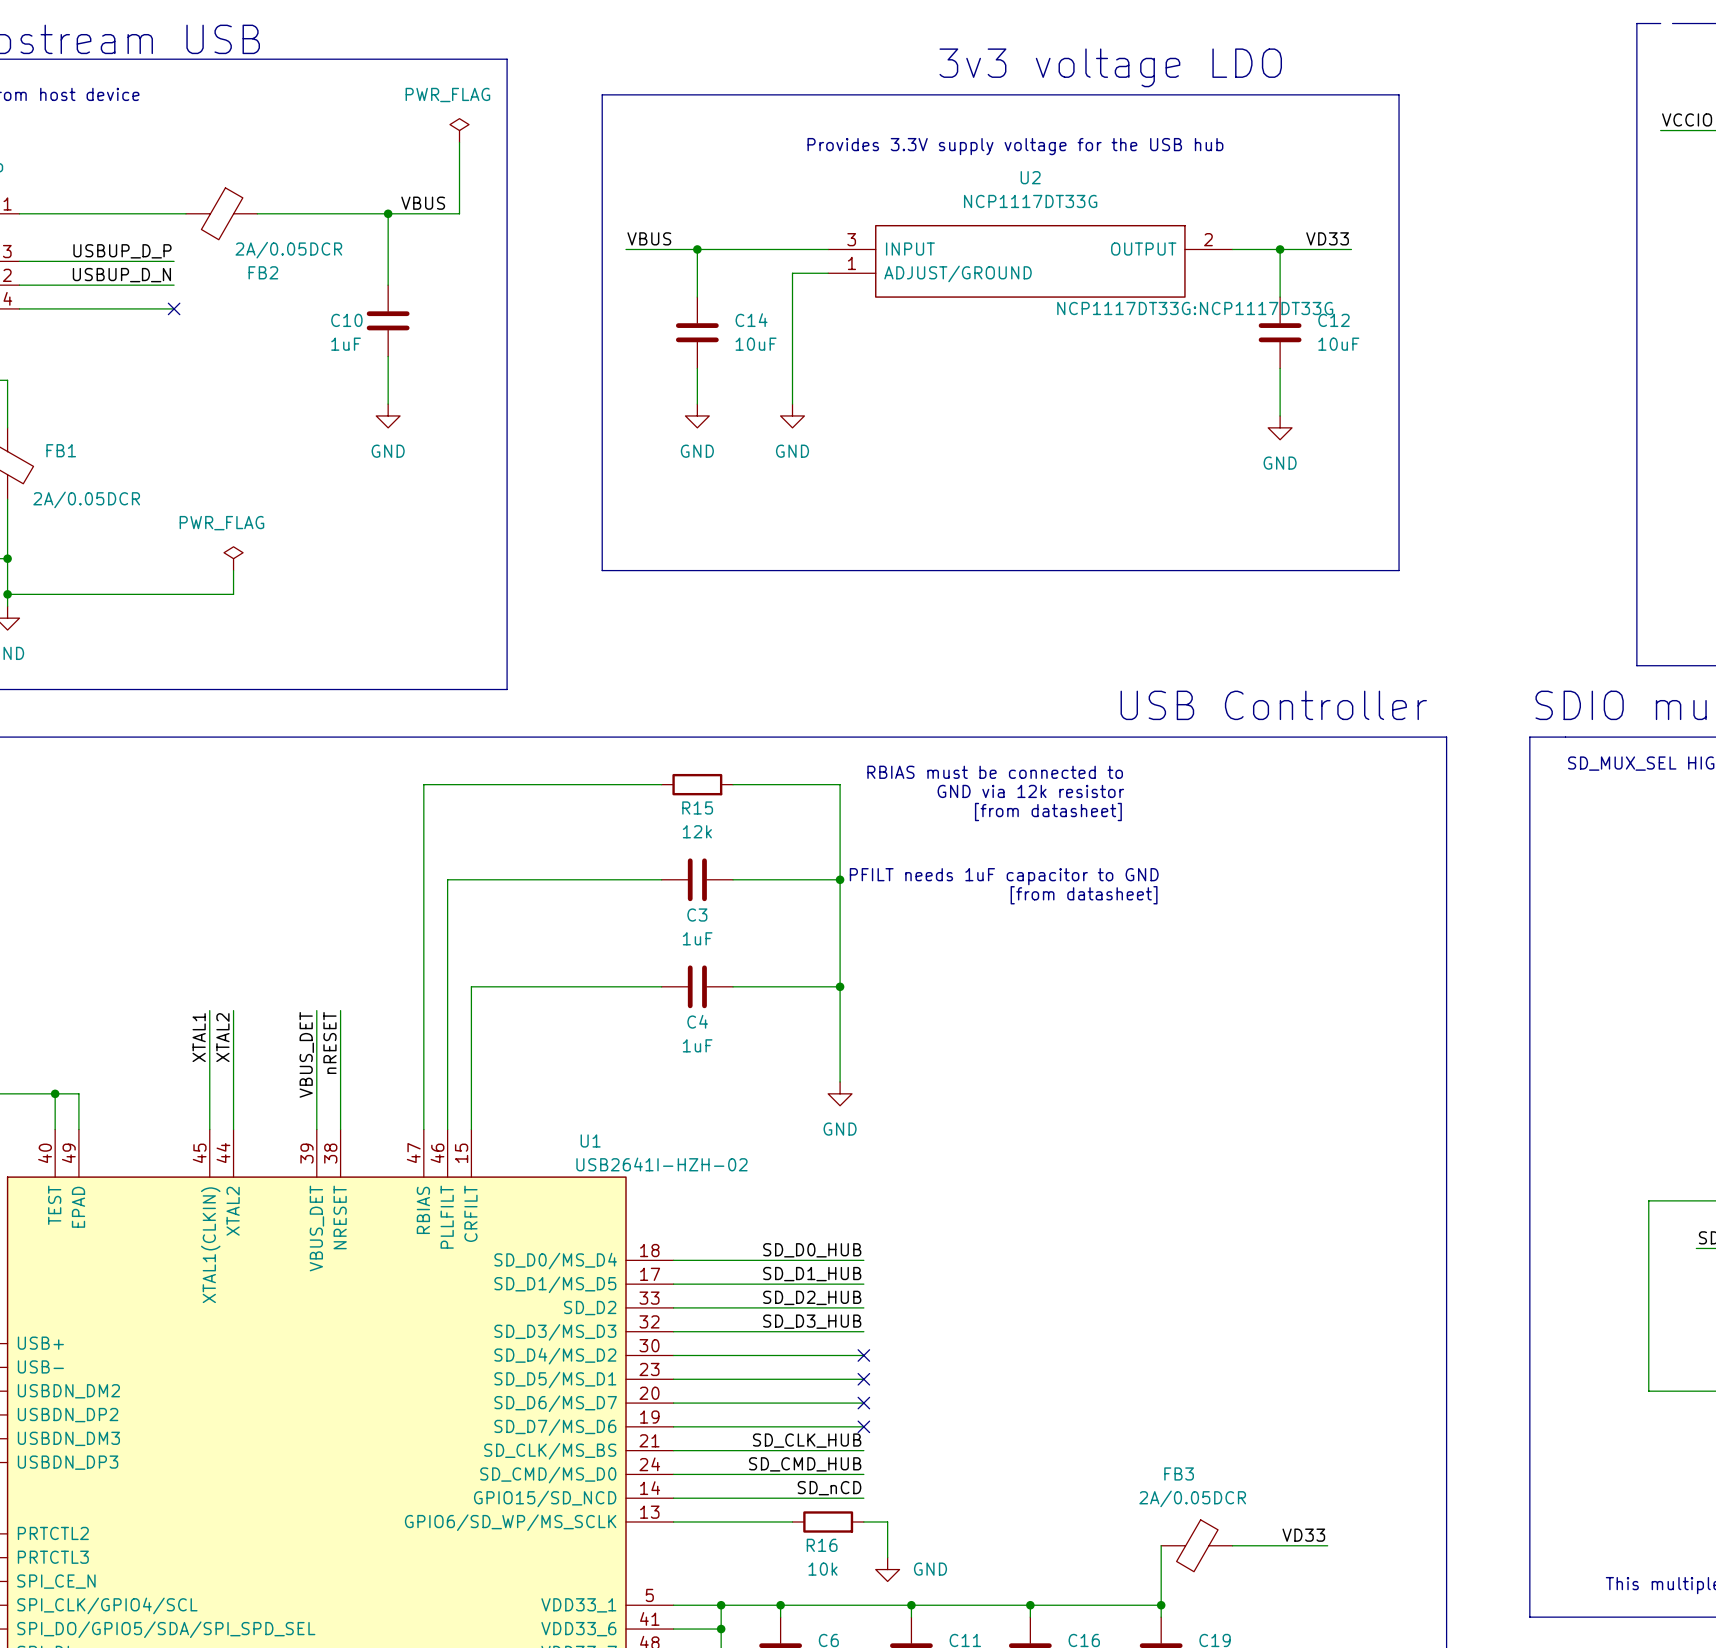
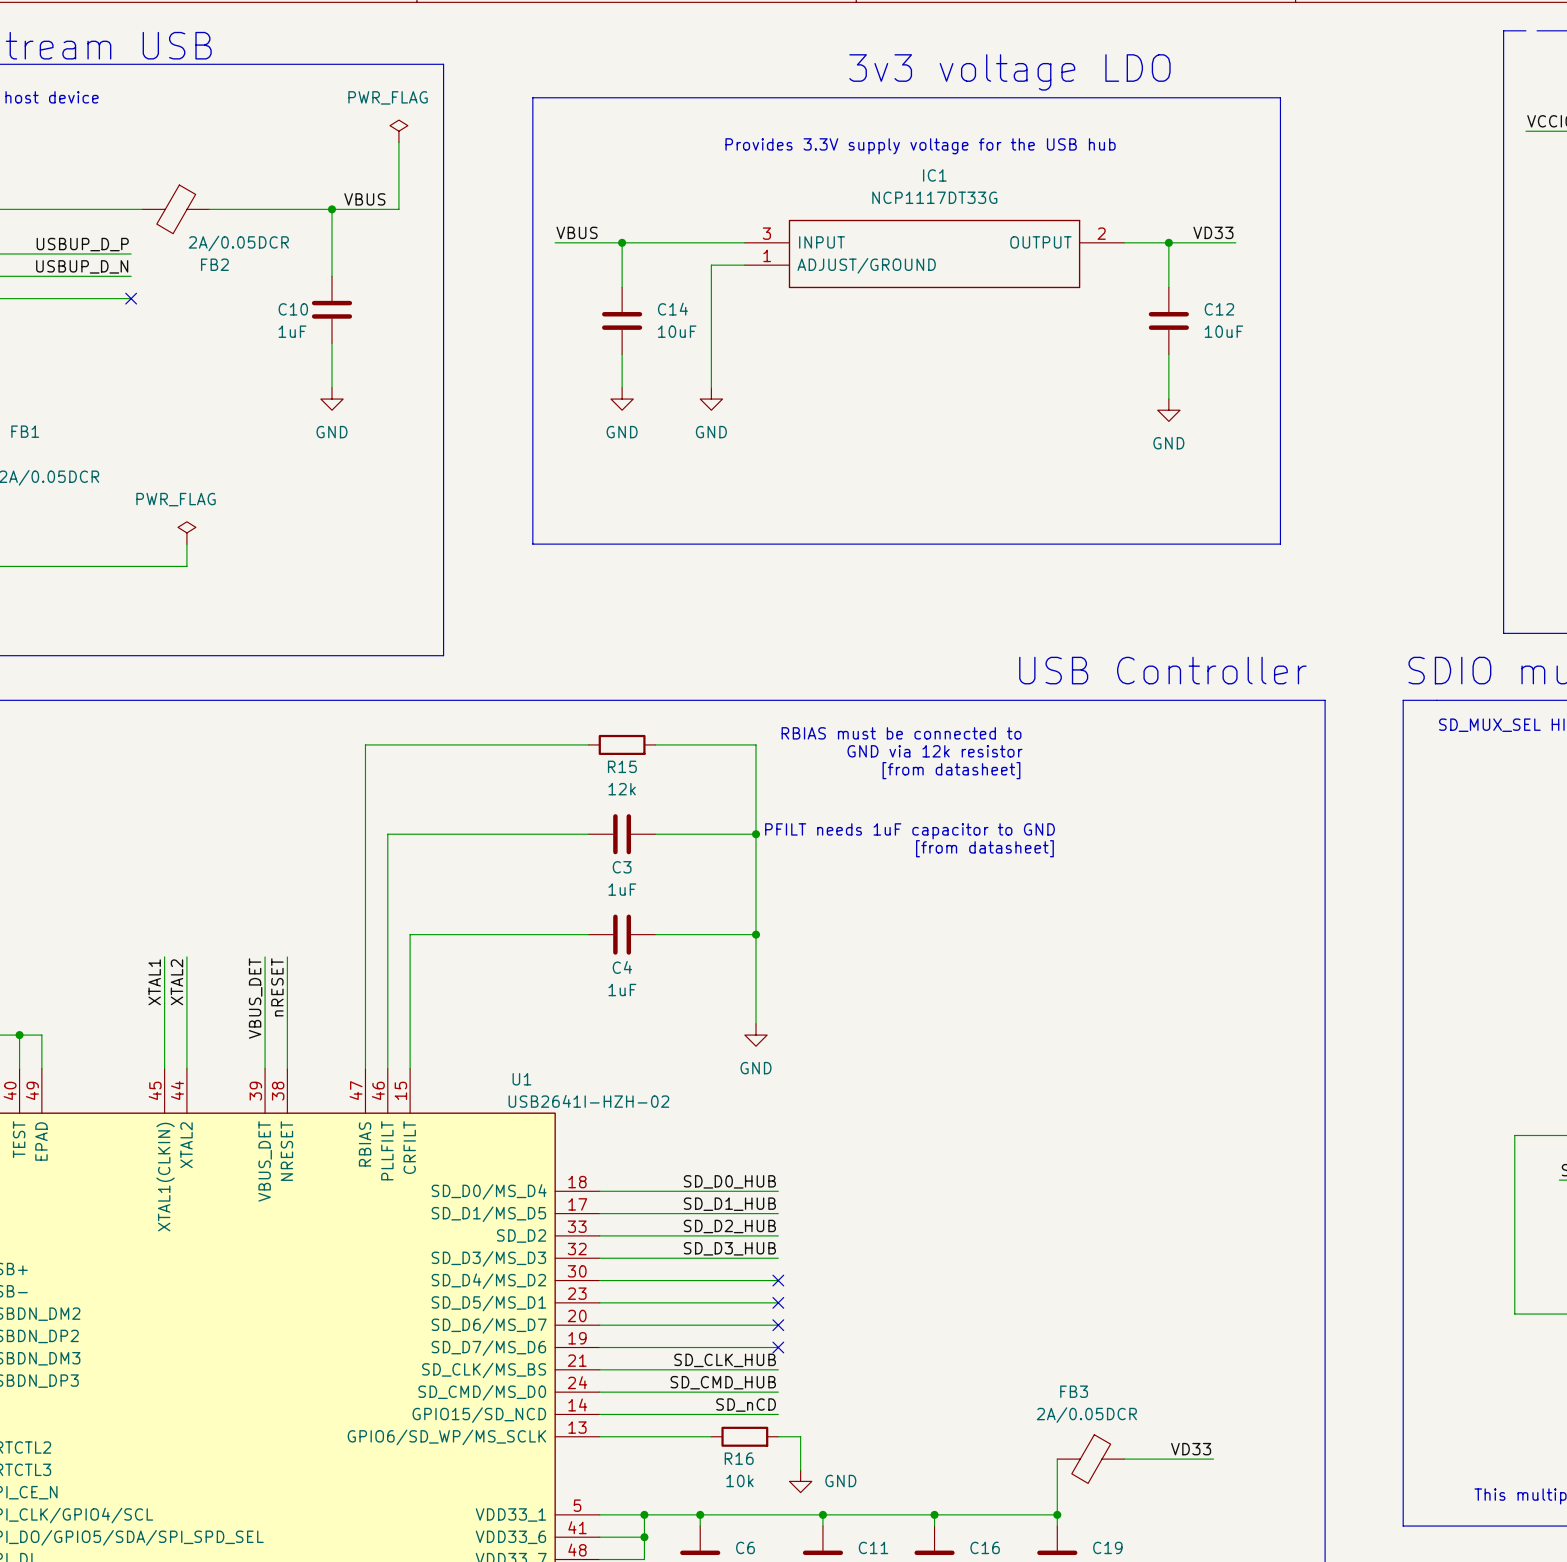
U2 name: U2 (1030, 177) -> IC1 (934, 175)
U2 text: NCP1117DT33G:NCP1117DT33G (1195, 308) -> none

